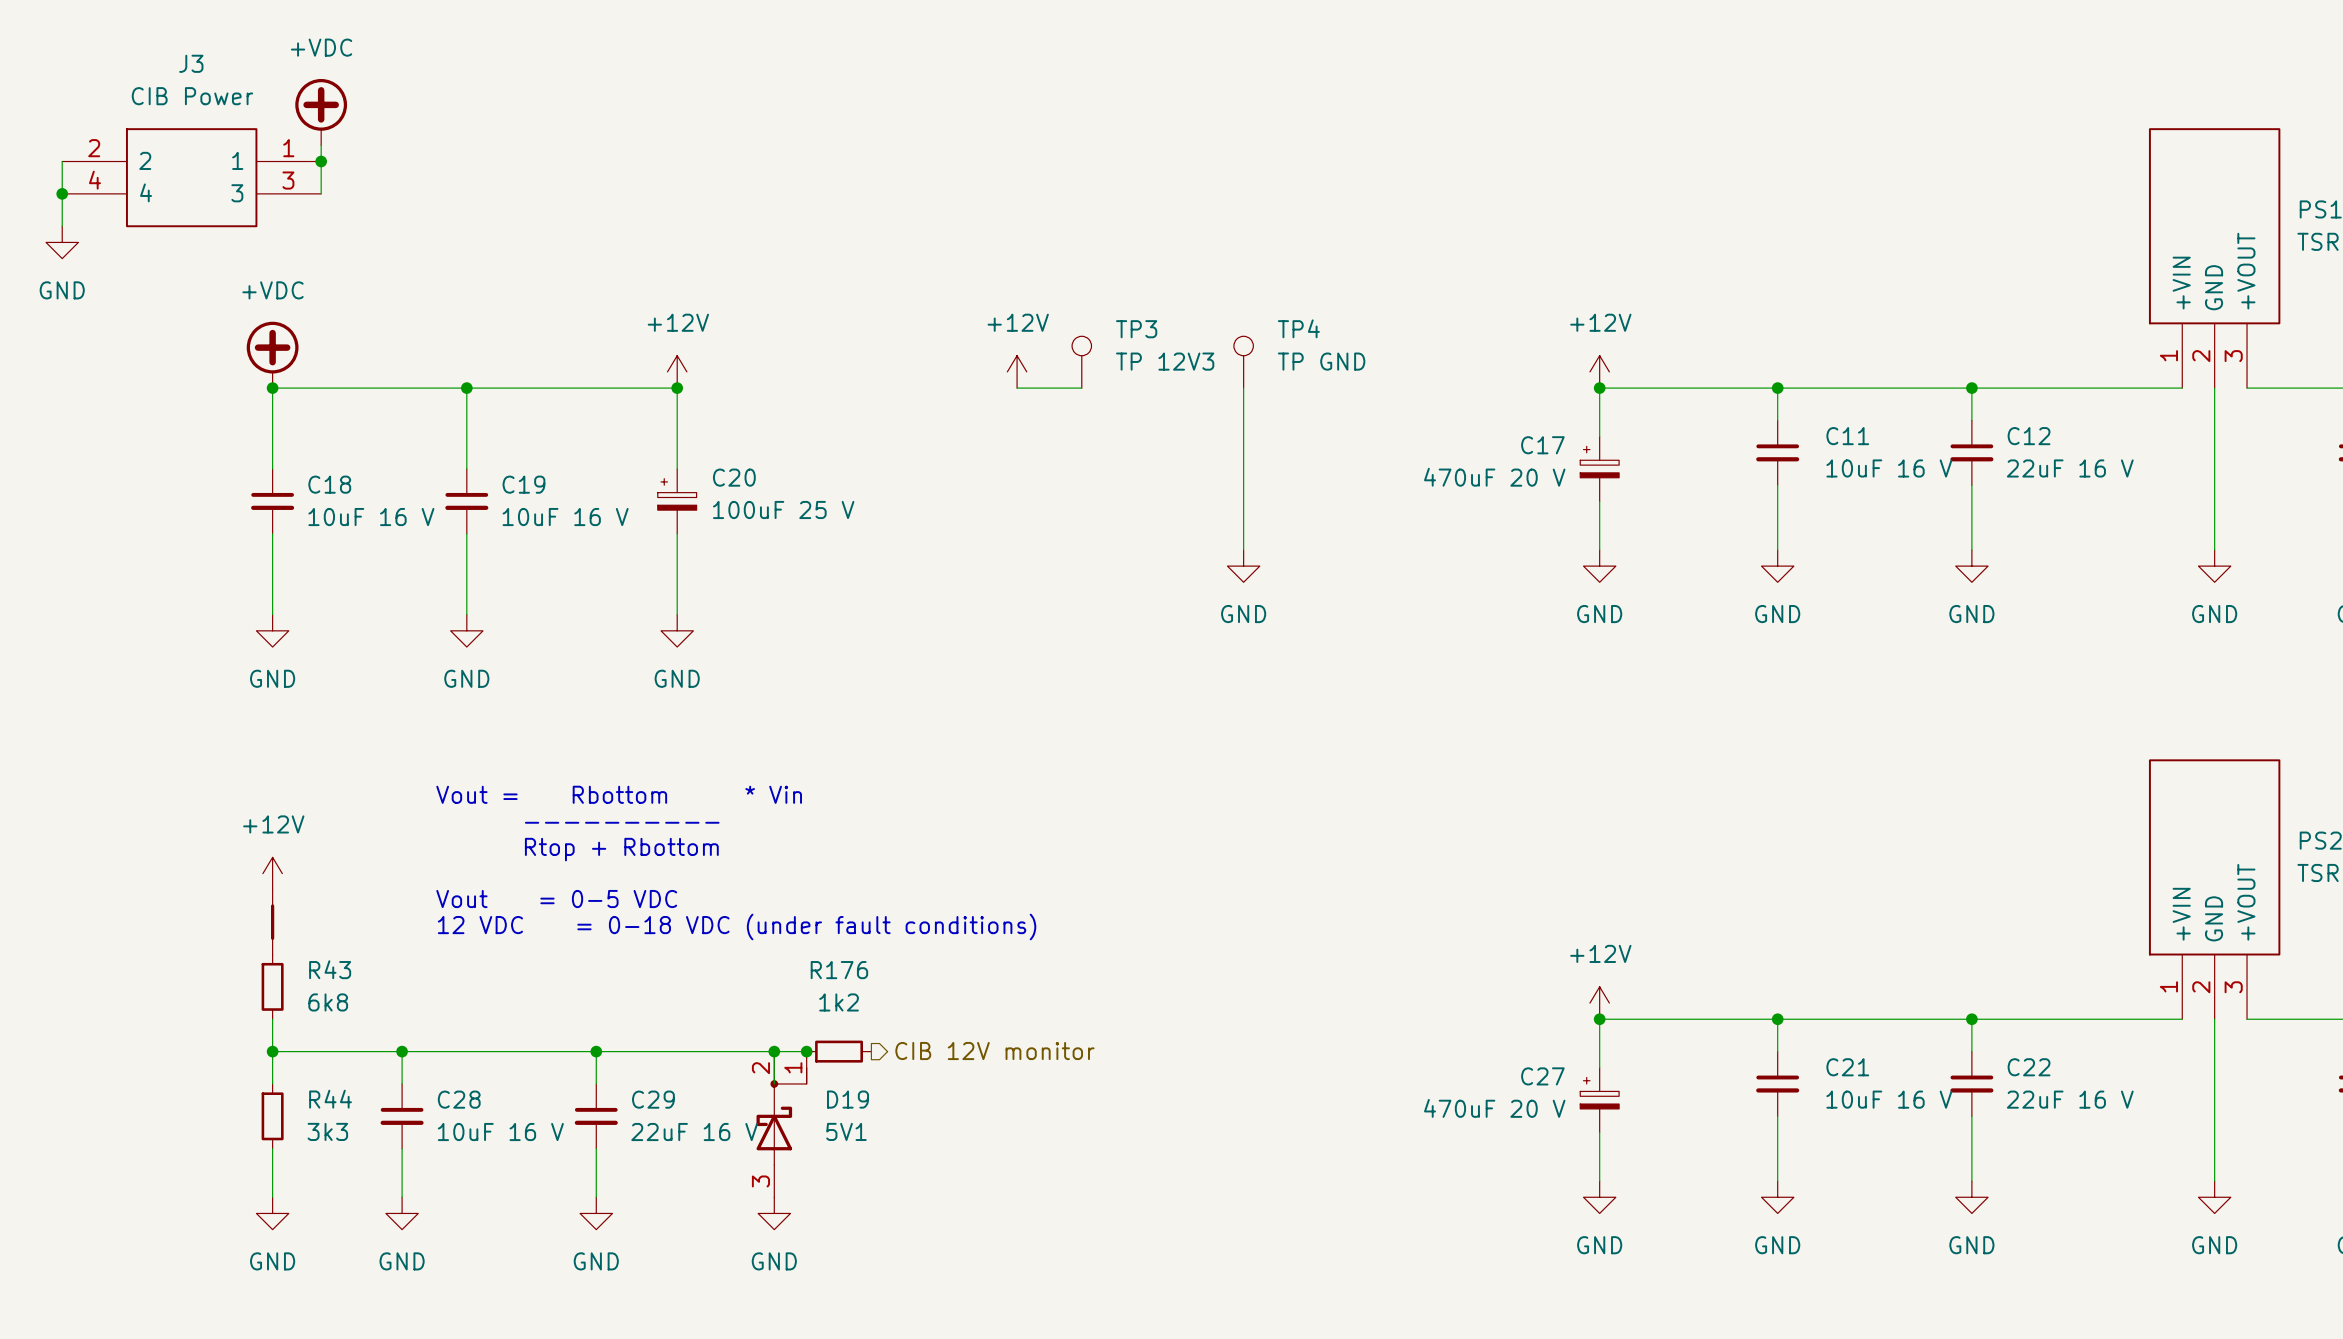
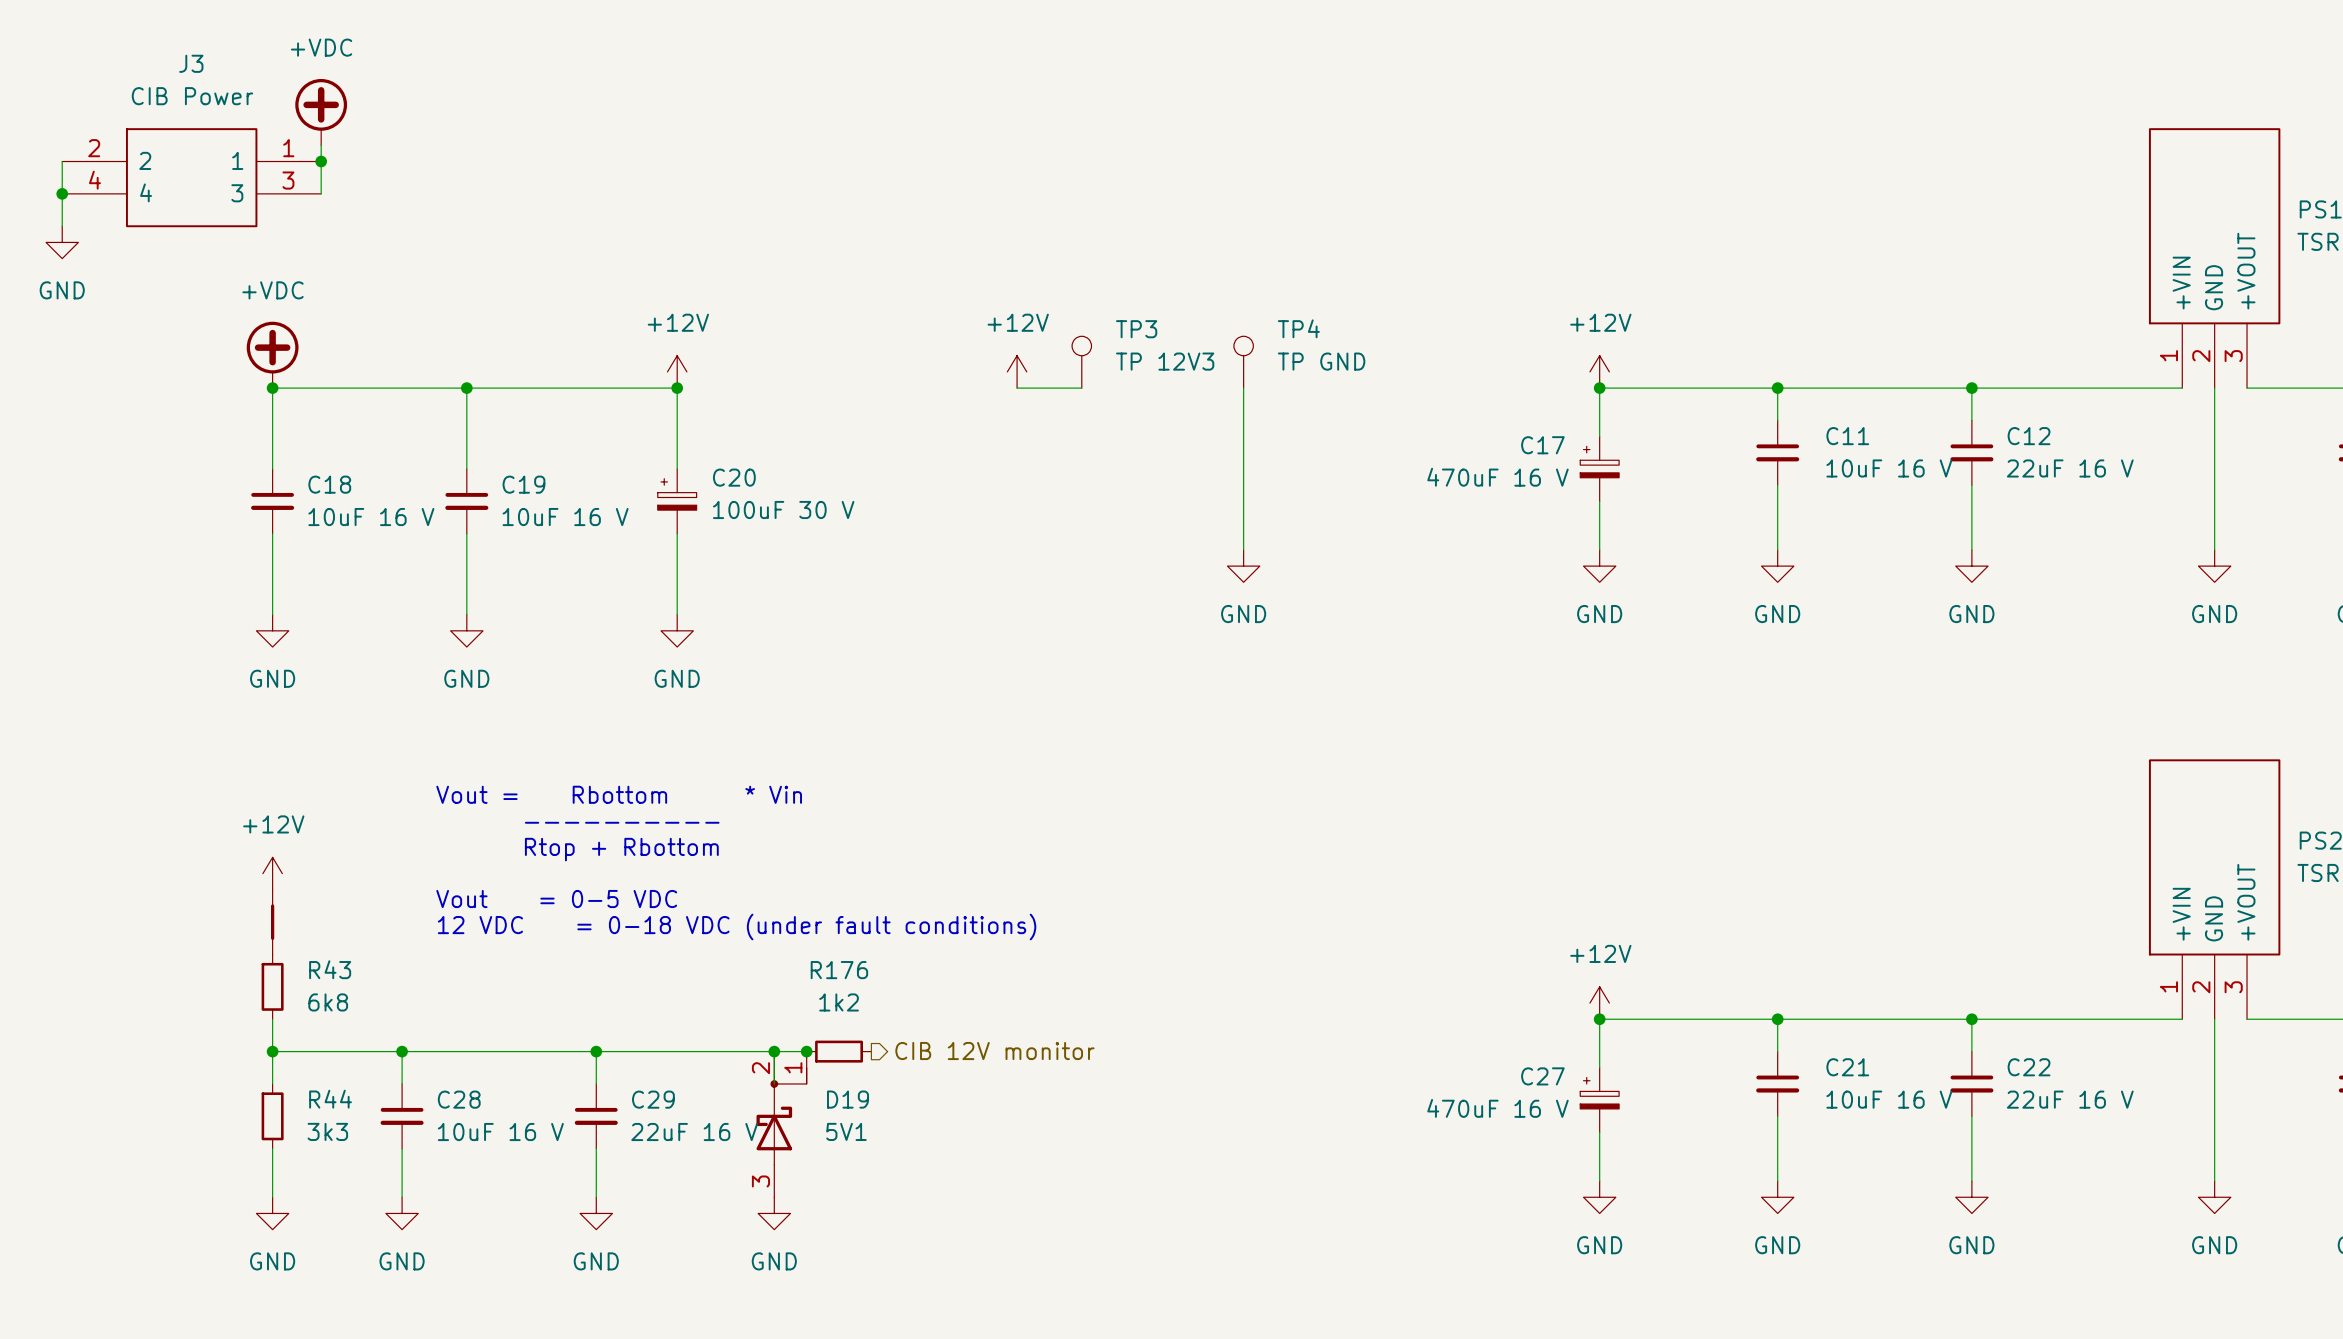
C17 value: 470uF 20 V (1494, 477) -> 470uF 16 V (1497, 477)
C20 value: 100uF 25 V (783, 509) -> 100uF 30 V (783, 509)
C27 value: 470uF 20 V (1494, 1108) -> 470uF 16 V (1497, 1108)

